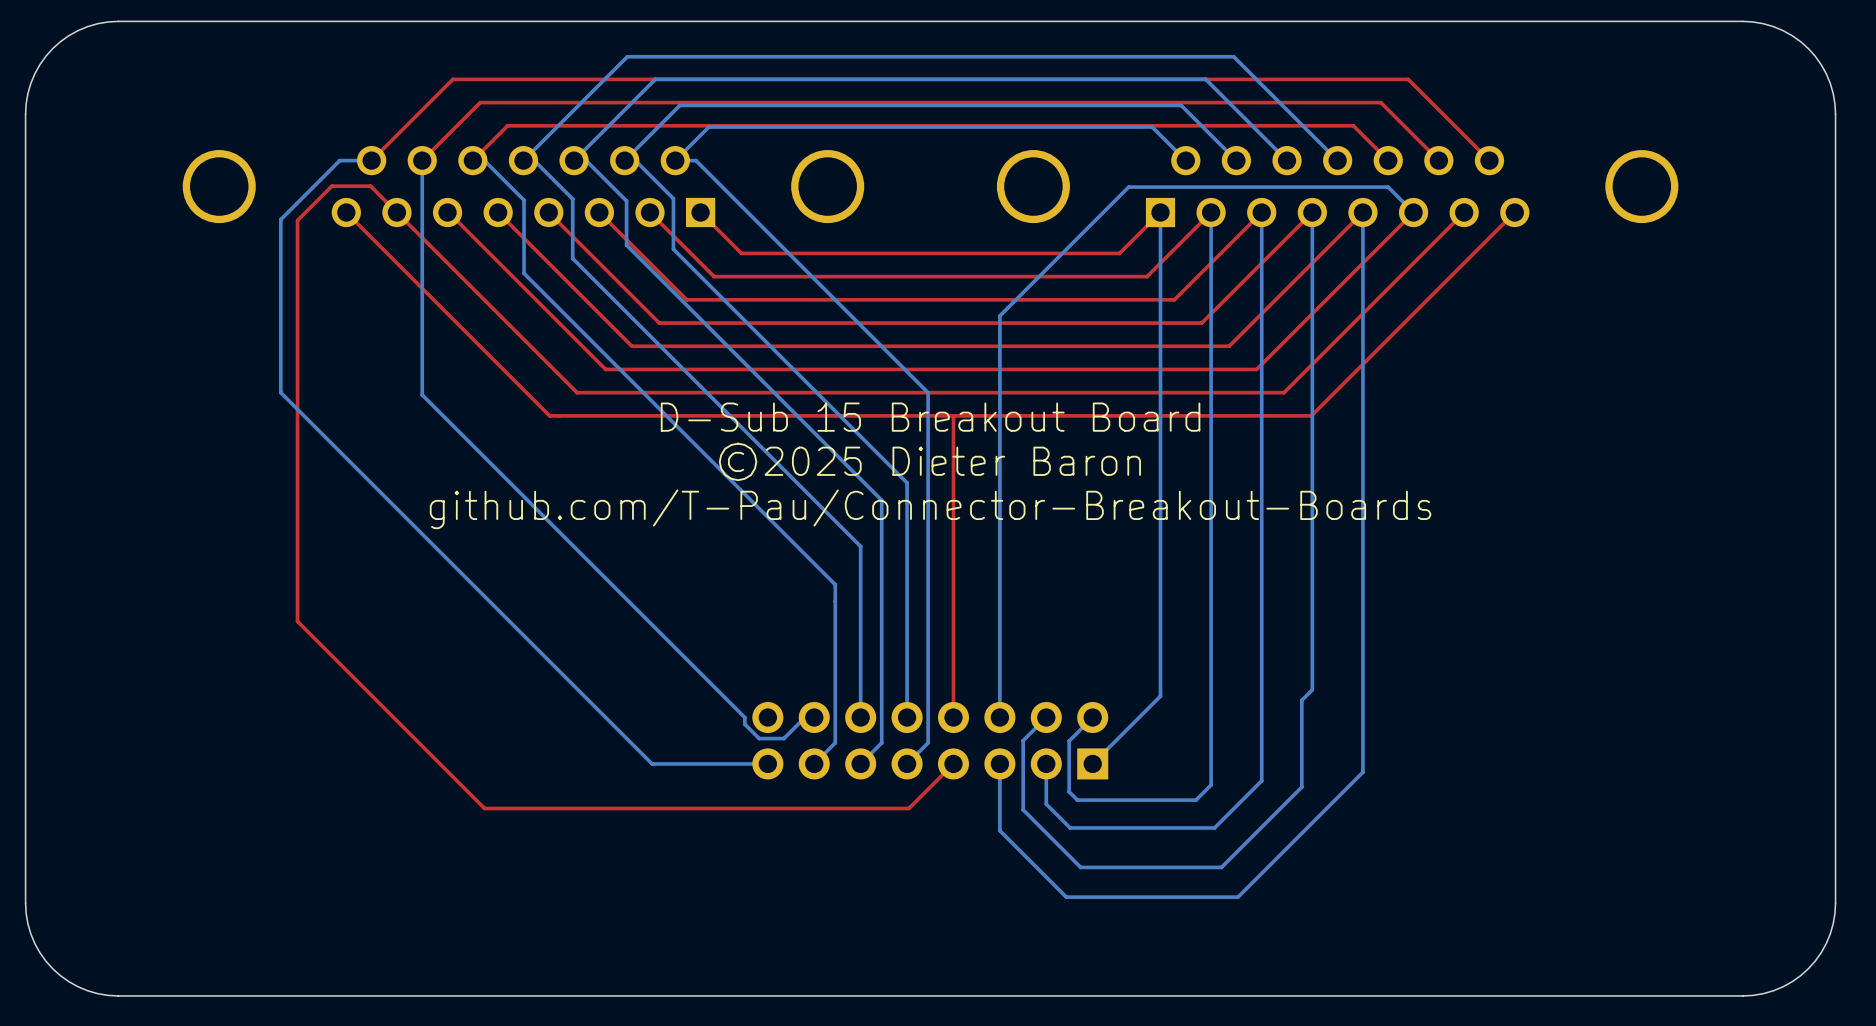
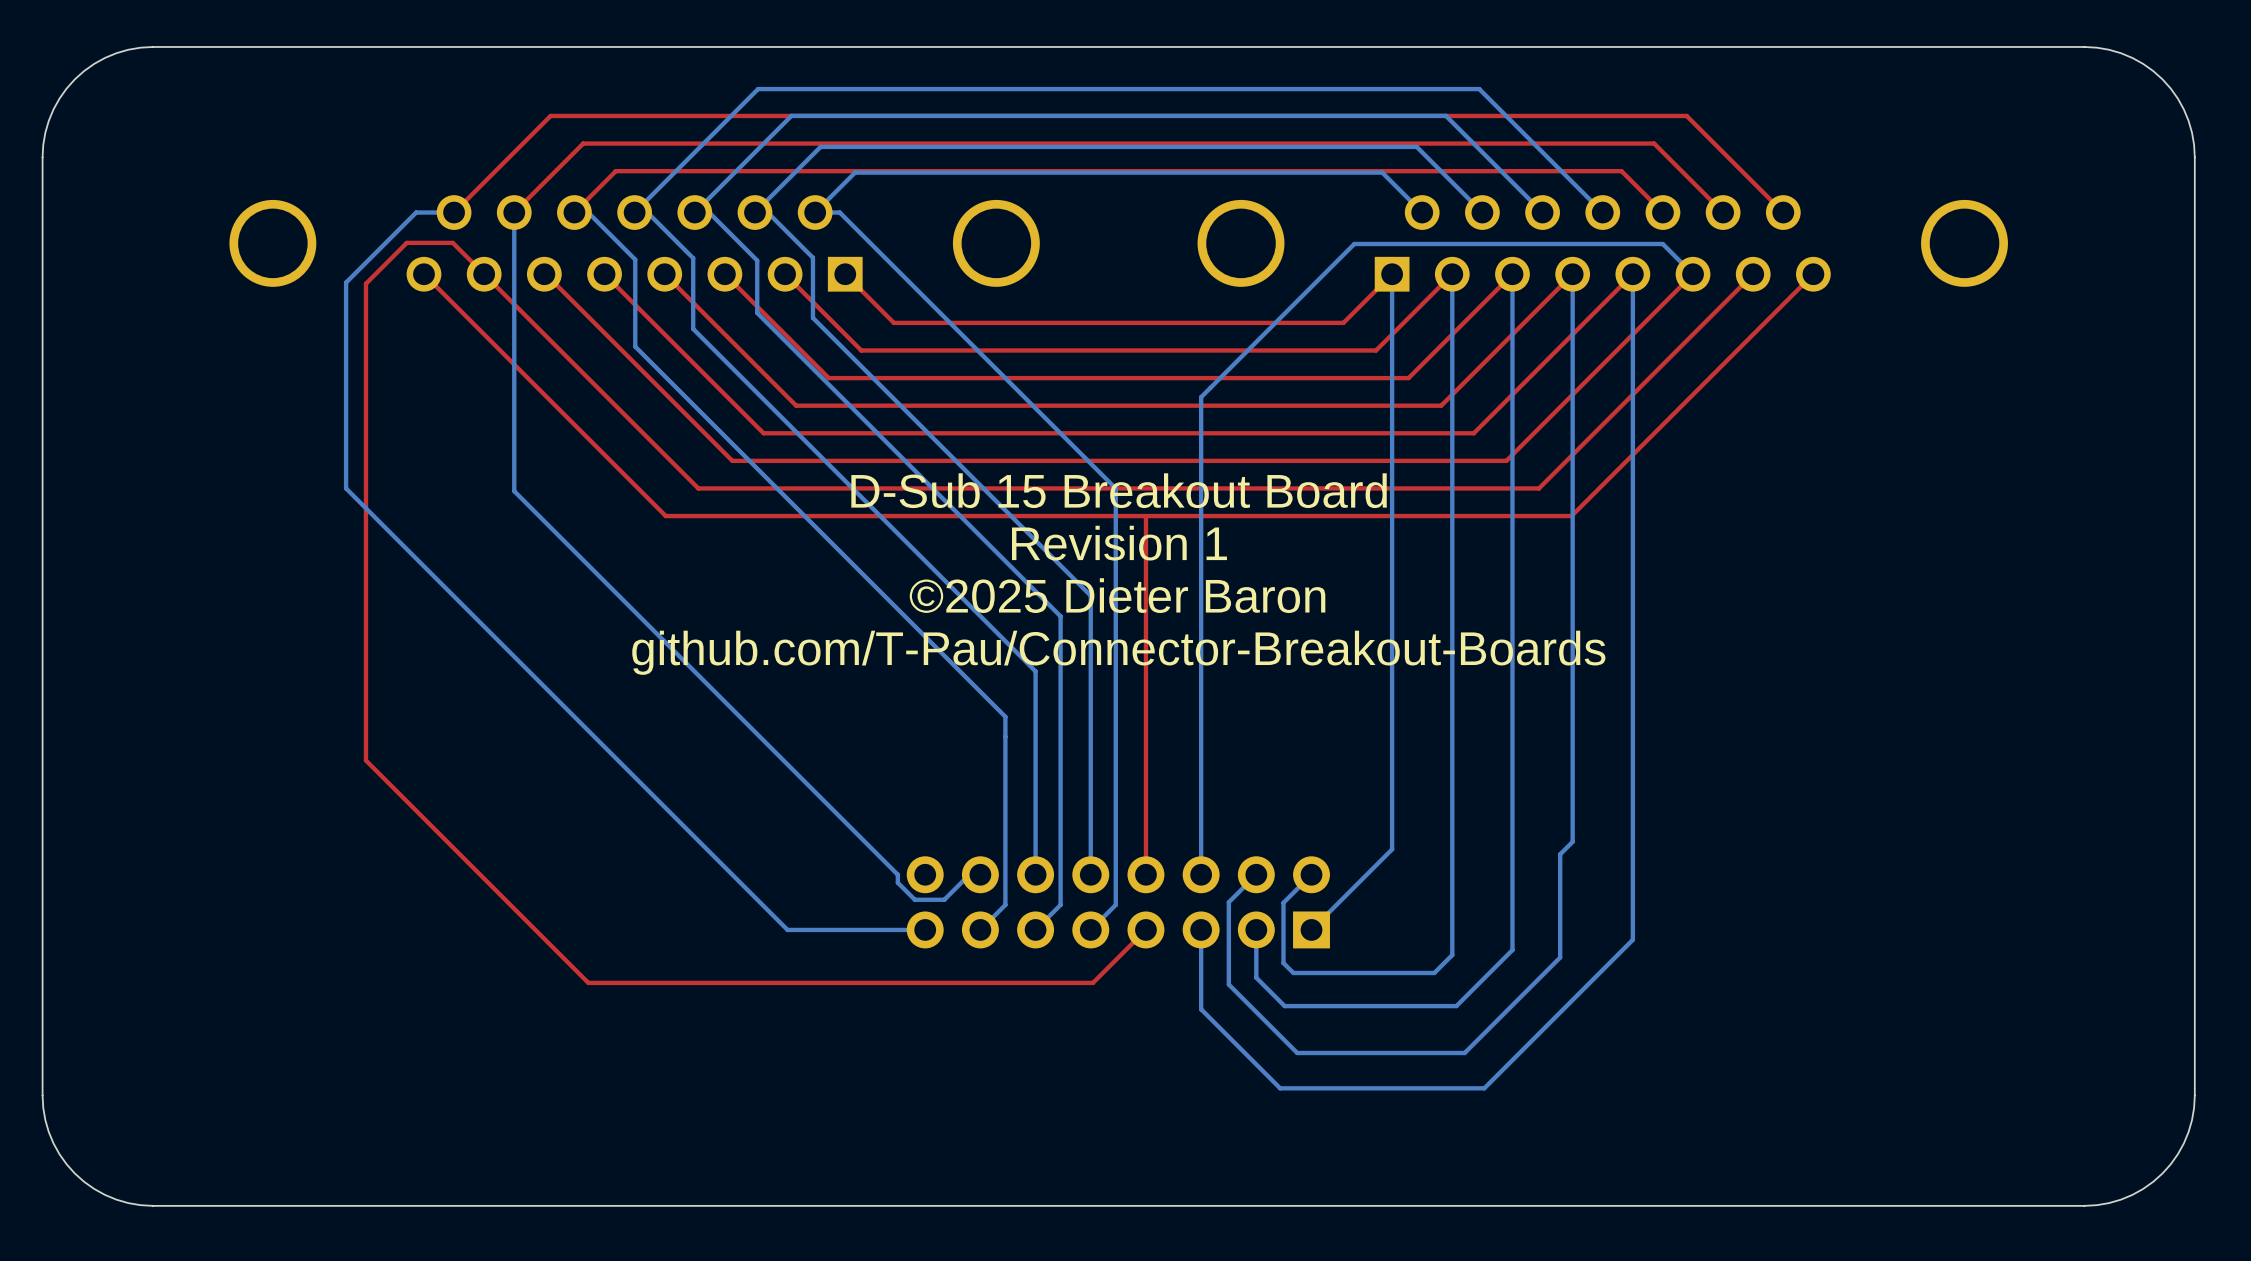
text position: D-Sub 15 Breakout Board (930, 417) -> D-Sub 15 Breakout Board (1119, 490)
text: none -> Revision 1 (1119, 543)
text position: ©2025 Dieter Baron (929, 461) -> ©2025 Dieter Baron (1117, 595)
text position: github.com/T-Pau/Connector-Breakout-Boards (930, 509) -> github.com/T-Pau/Connector-Breakout-Boards (1118, 652)

